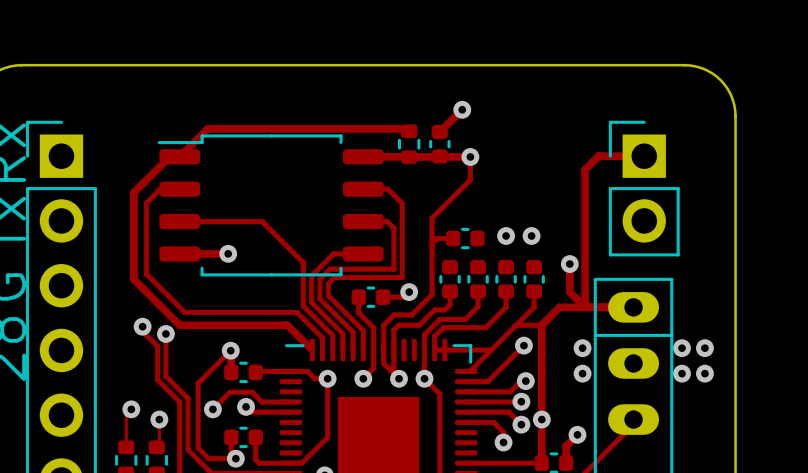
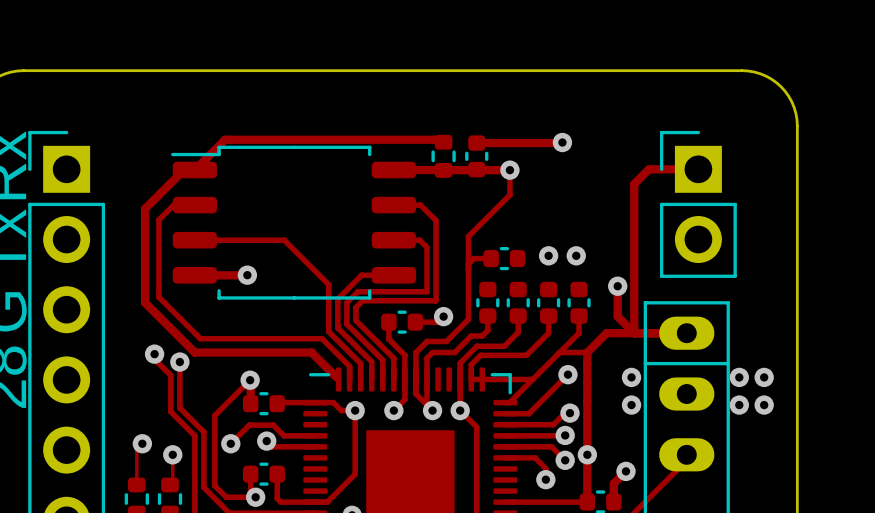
track: (462, 109) (440, 131) -> (562, 142) (477, 143)
via position: (462, 109) -> (562, 142)

